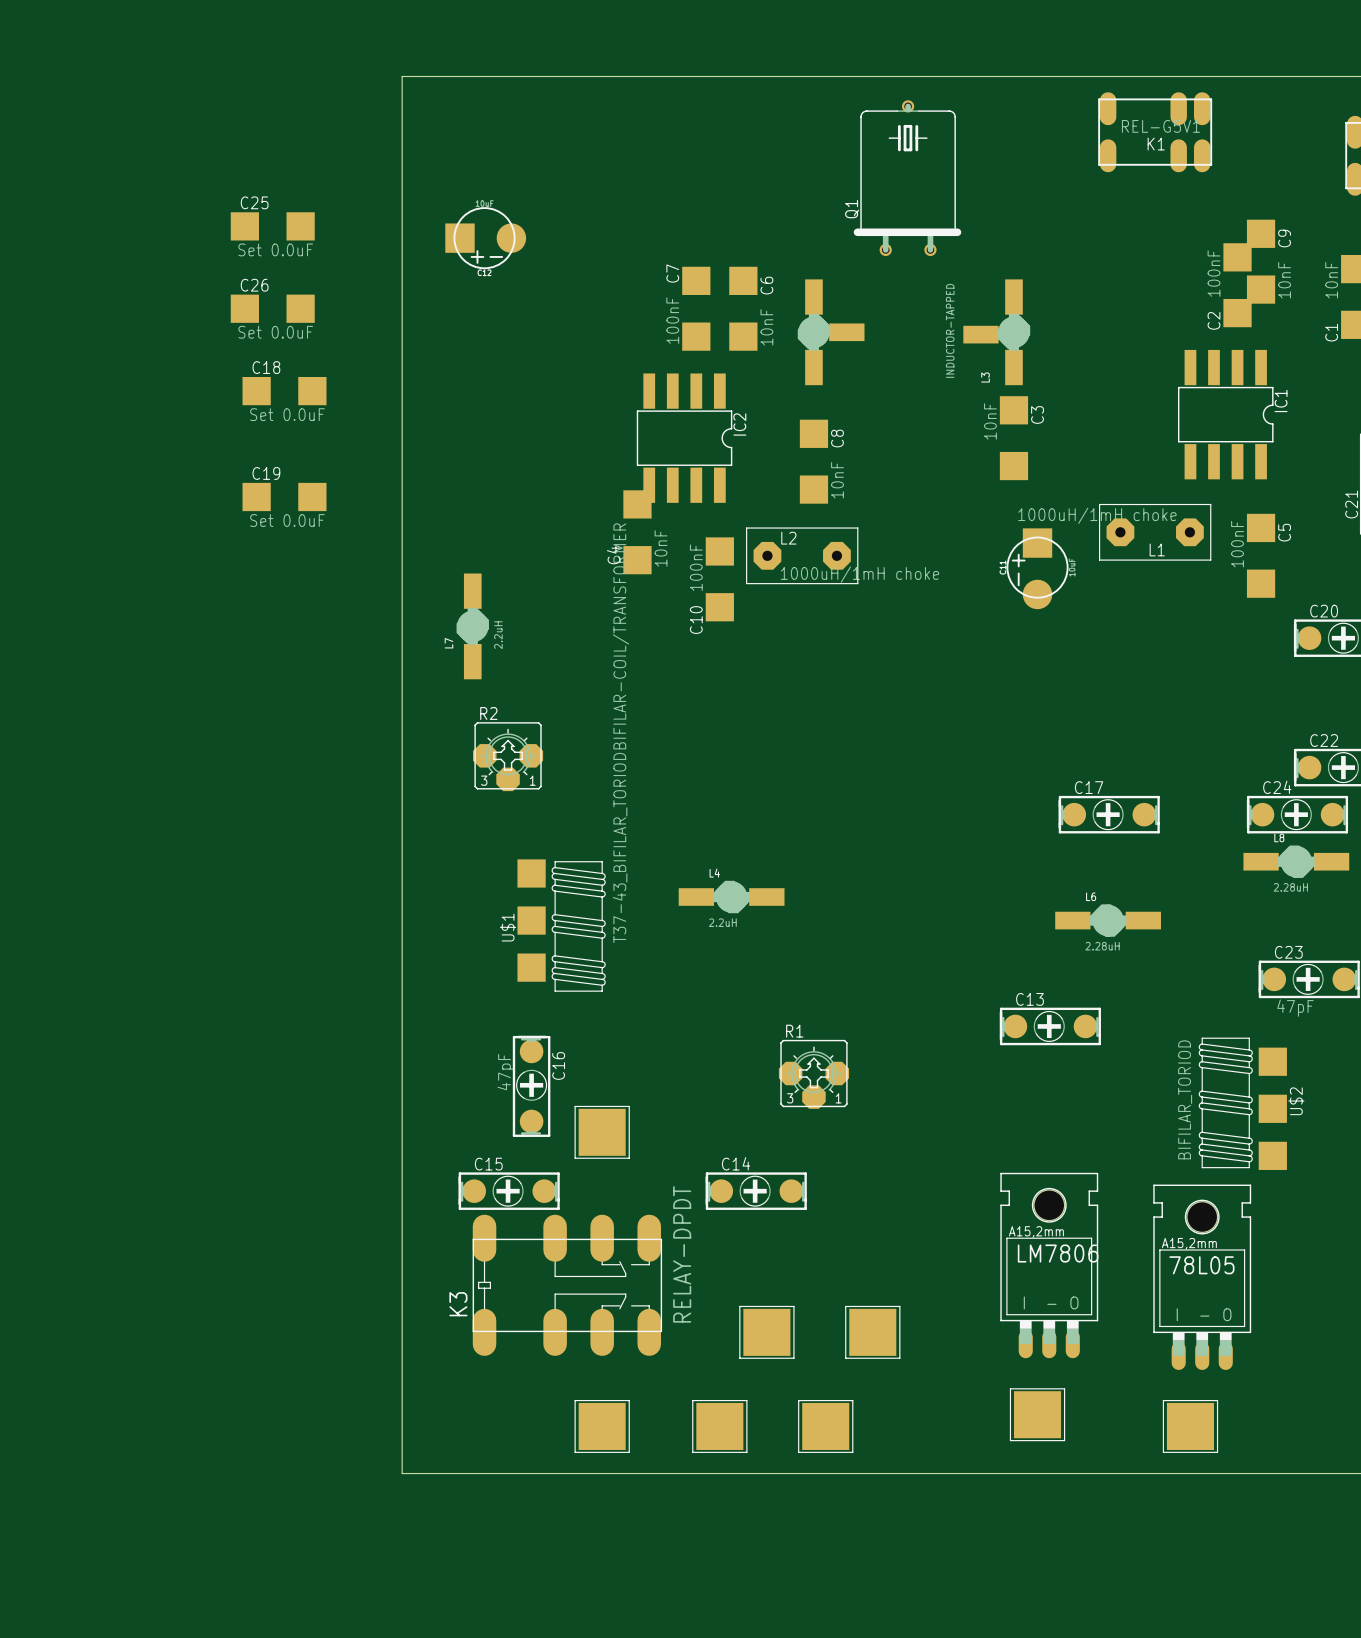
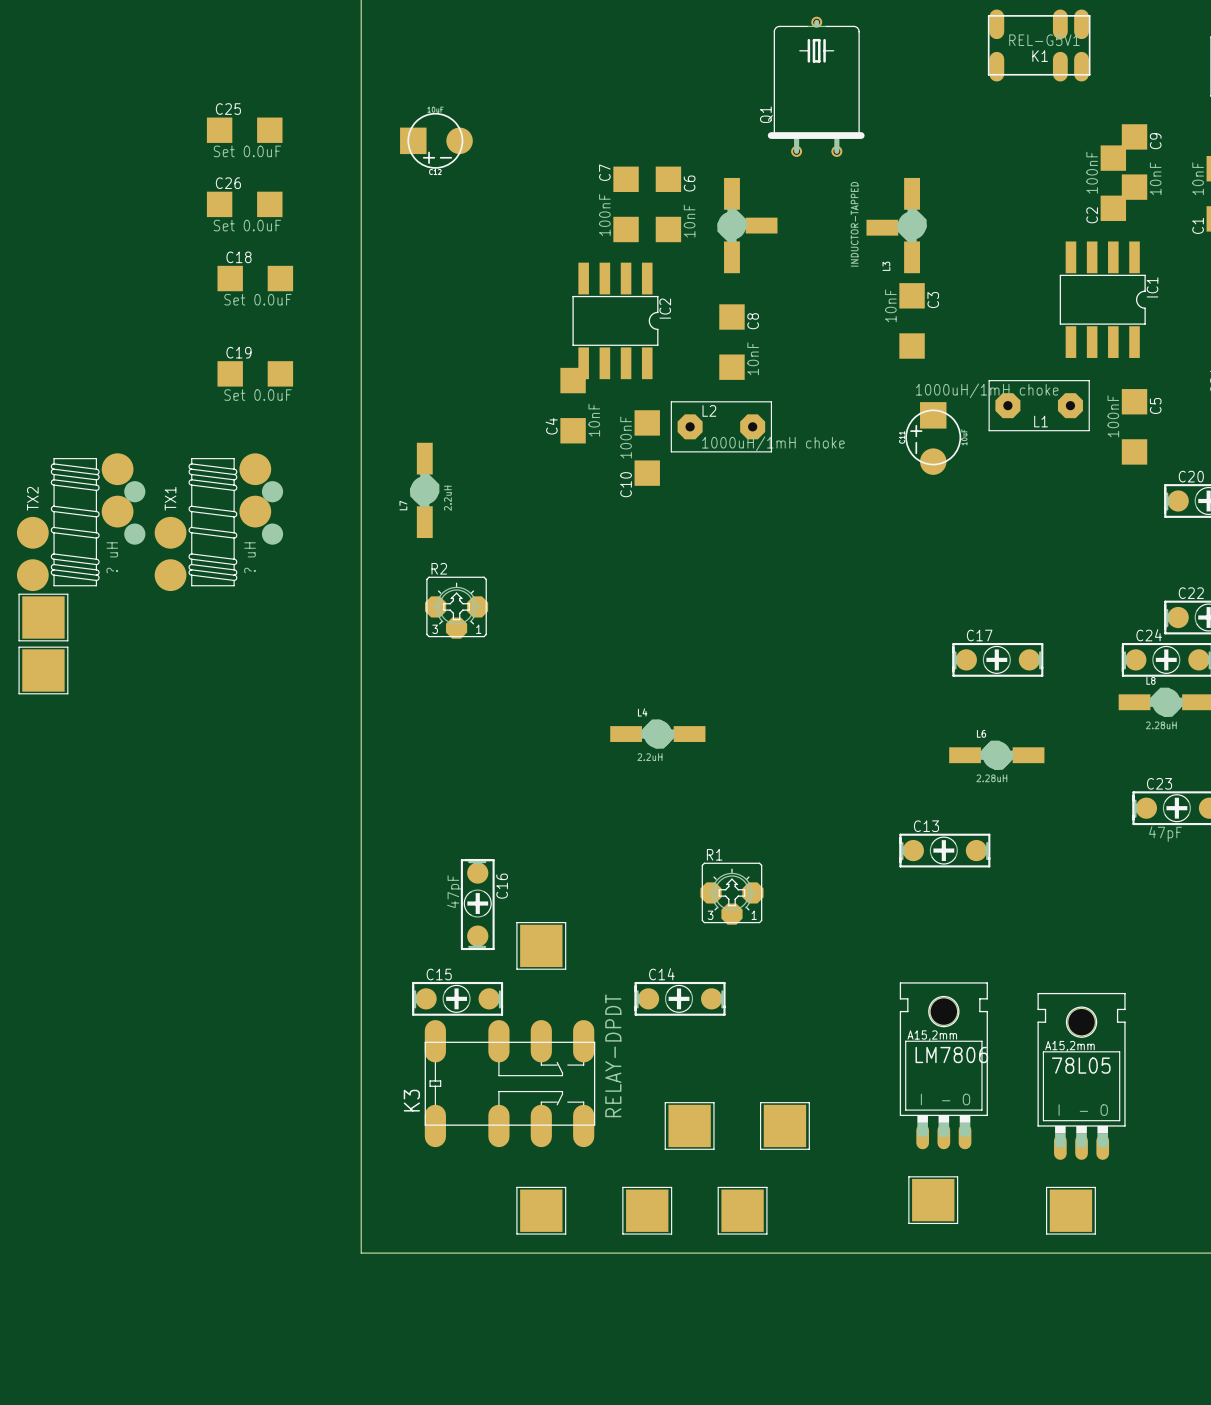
TX2: none -> ? uH (81, 522)
TX1: none -> ? uH (218, 522)
part: none -> (43, 617)
part: none -> (43, 670)
U$1: T37-43_BIFILAR_TORIODBIFILAR-COIL/TRANSFORMER (561, 925) -> none
U$2: BIFILAR_TORIOD (1242, 1103) -> none

